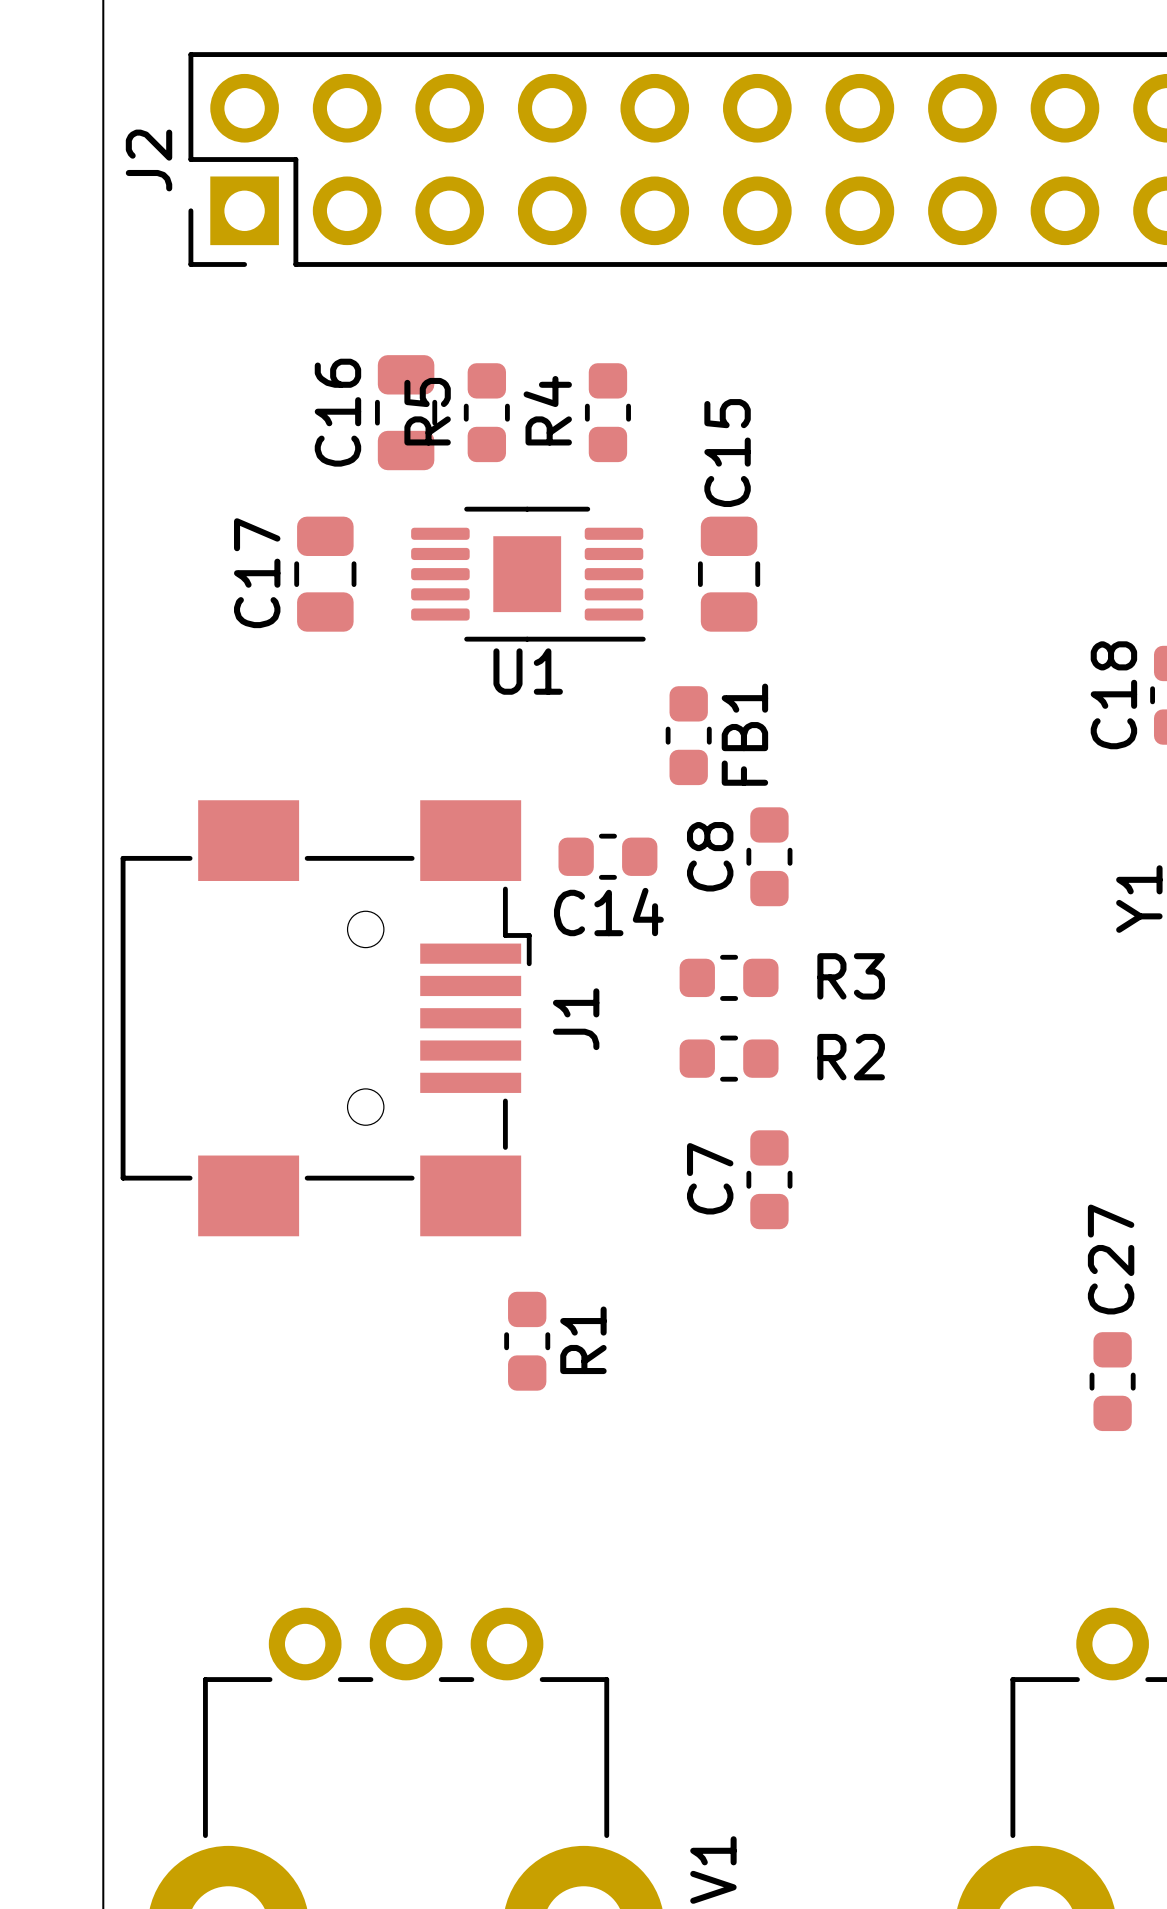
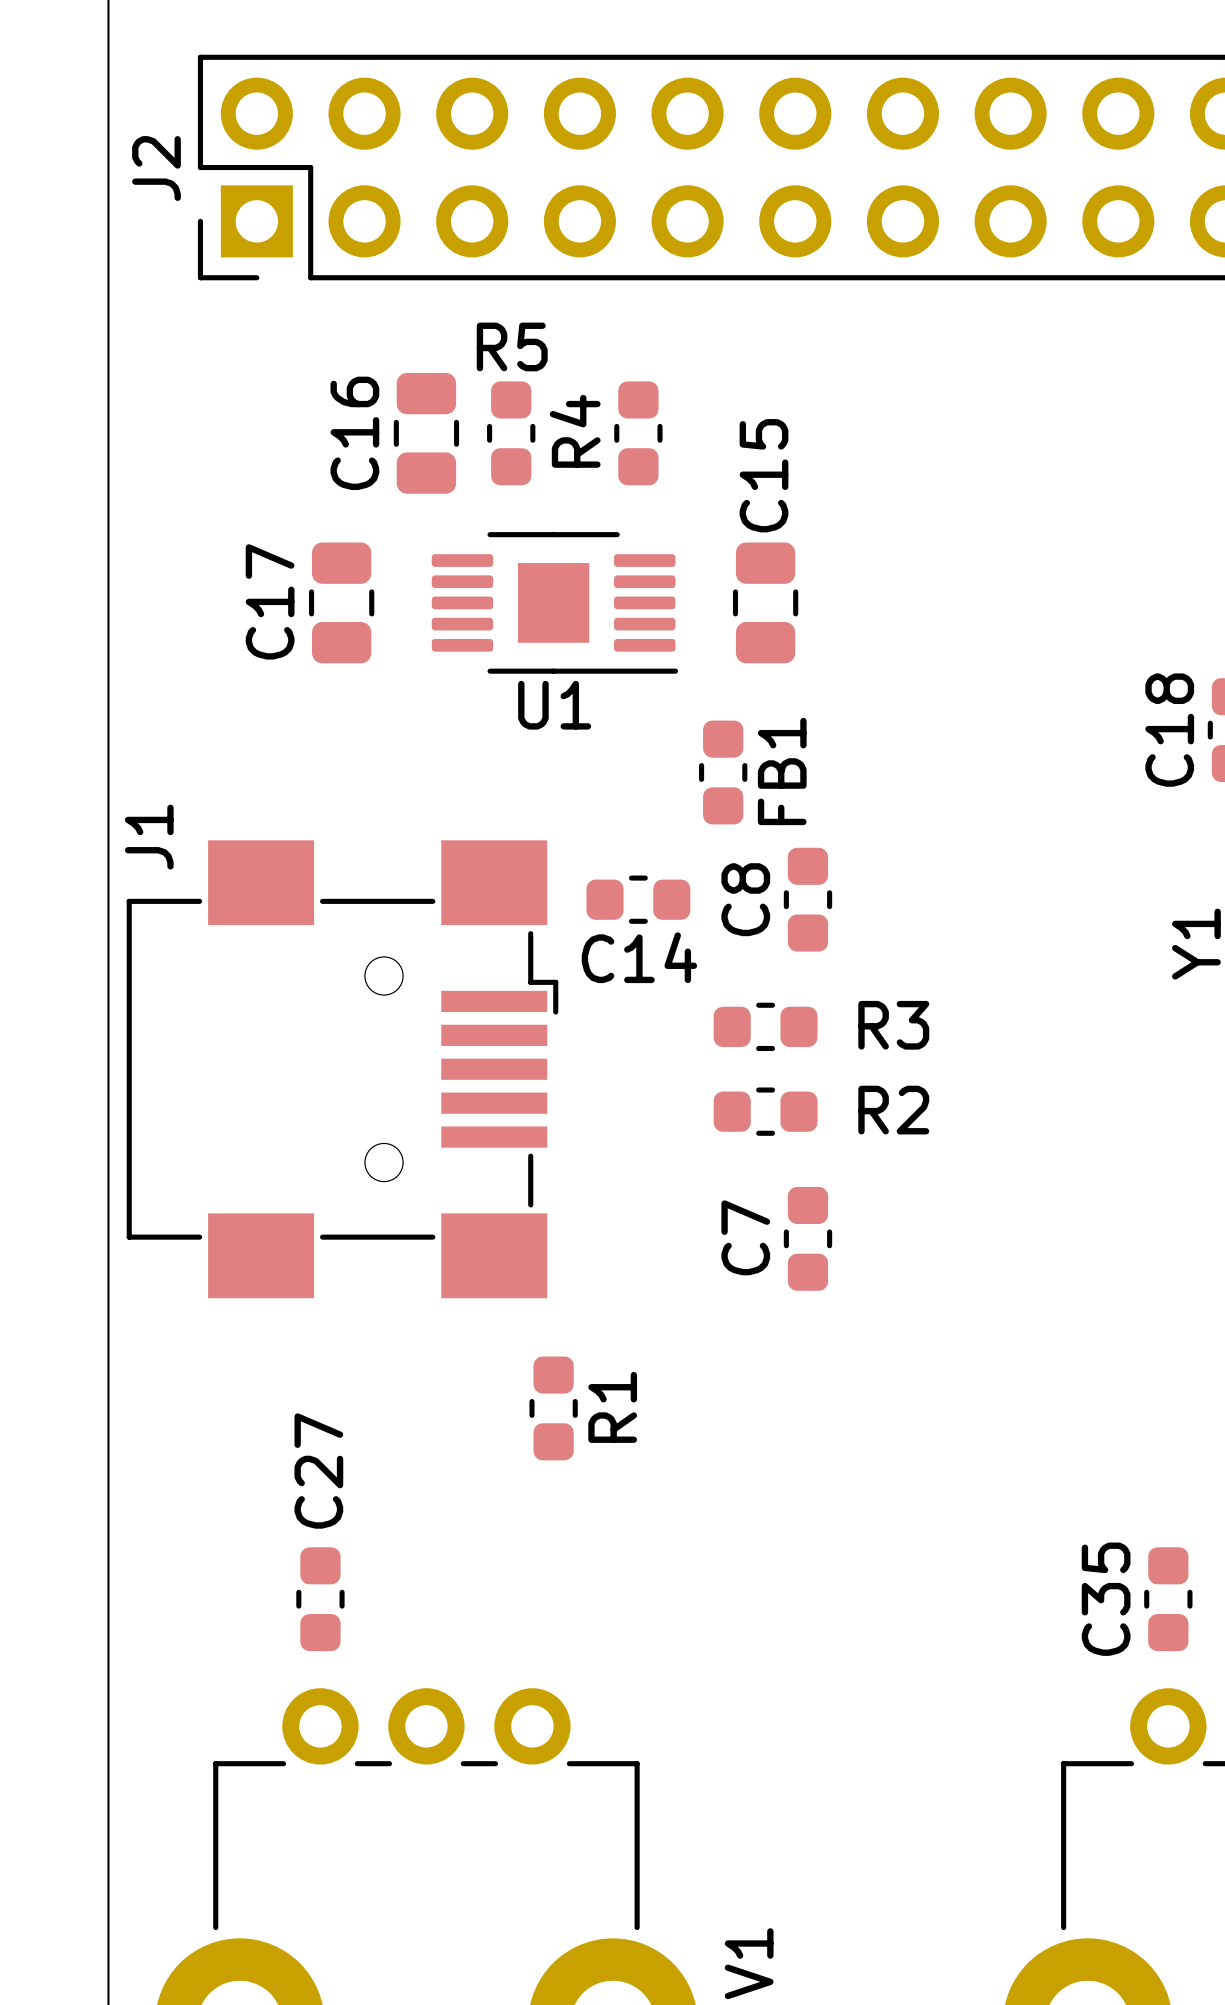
R5 name rotation: 0° (427, 411) -> 90° clockwise (512, 346)
J1 name position: J1 (576, 1019) -> J1 (149, 837)
C27 position: (1112, 1381) -> (320, 1599)
C35: none -> (1168, 1599)

